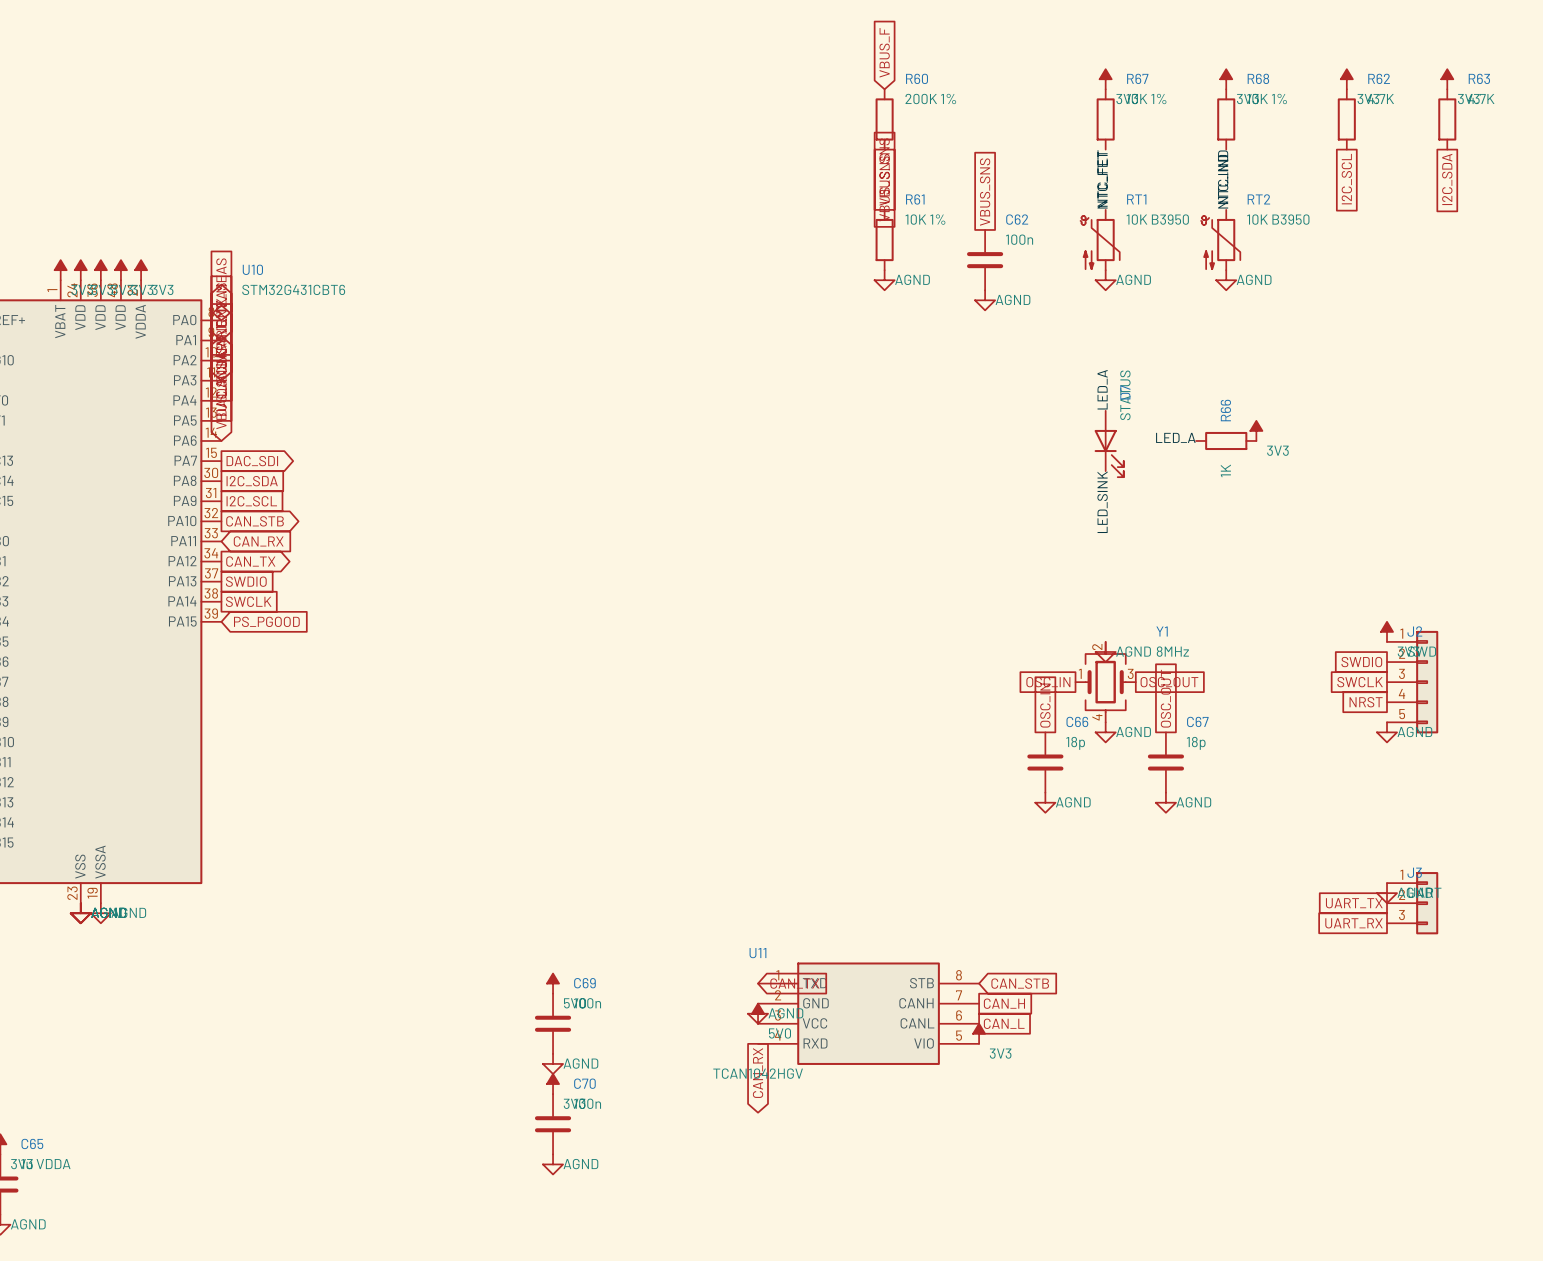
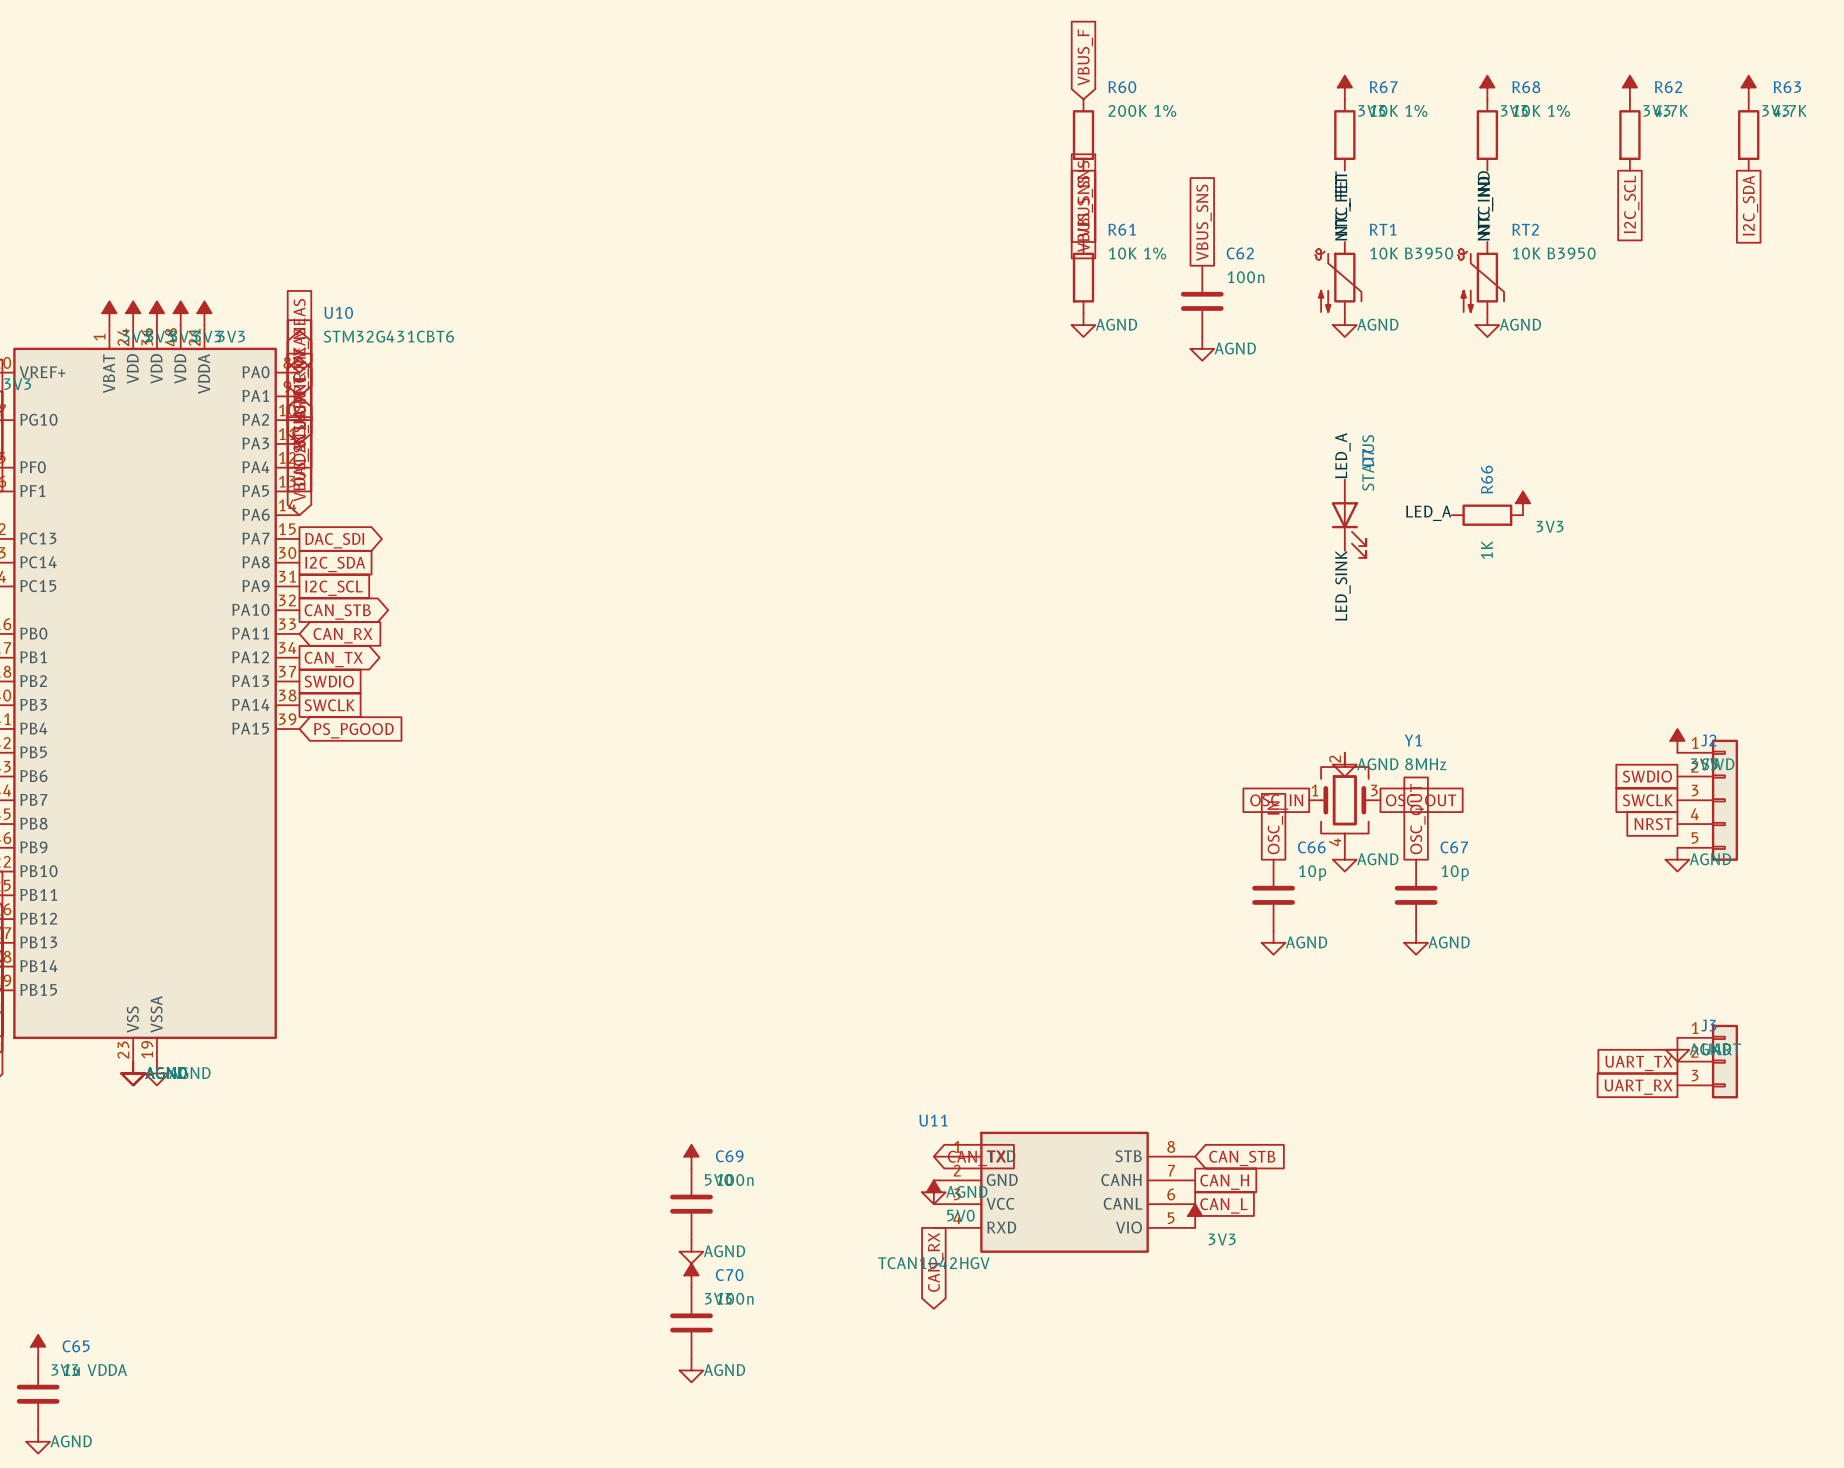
C66 value: 18p (1075, 743) -> 10p (1312, 873)
C67 value: 18p (1196, 743) -> 10p (1455, 873)

